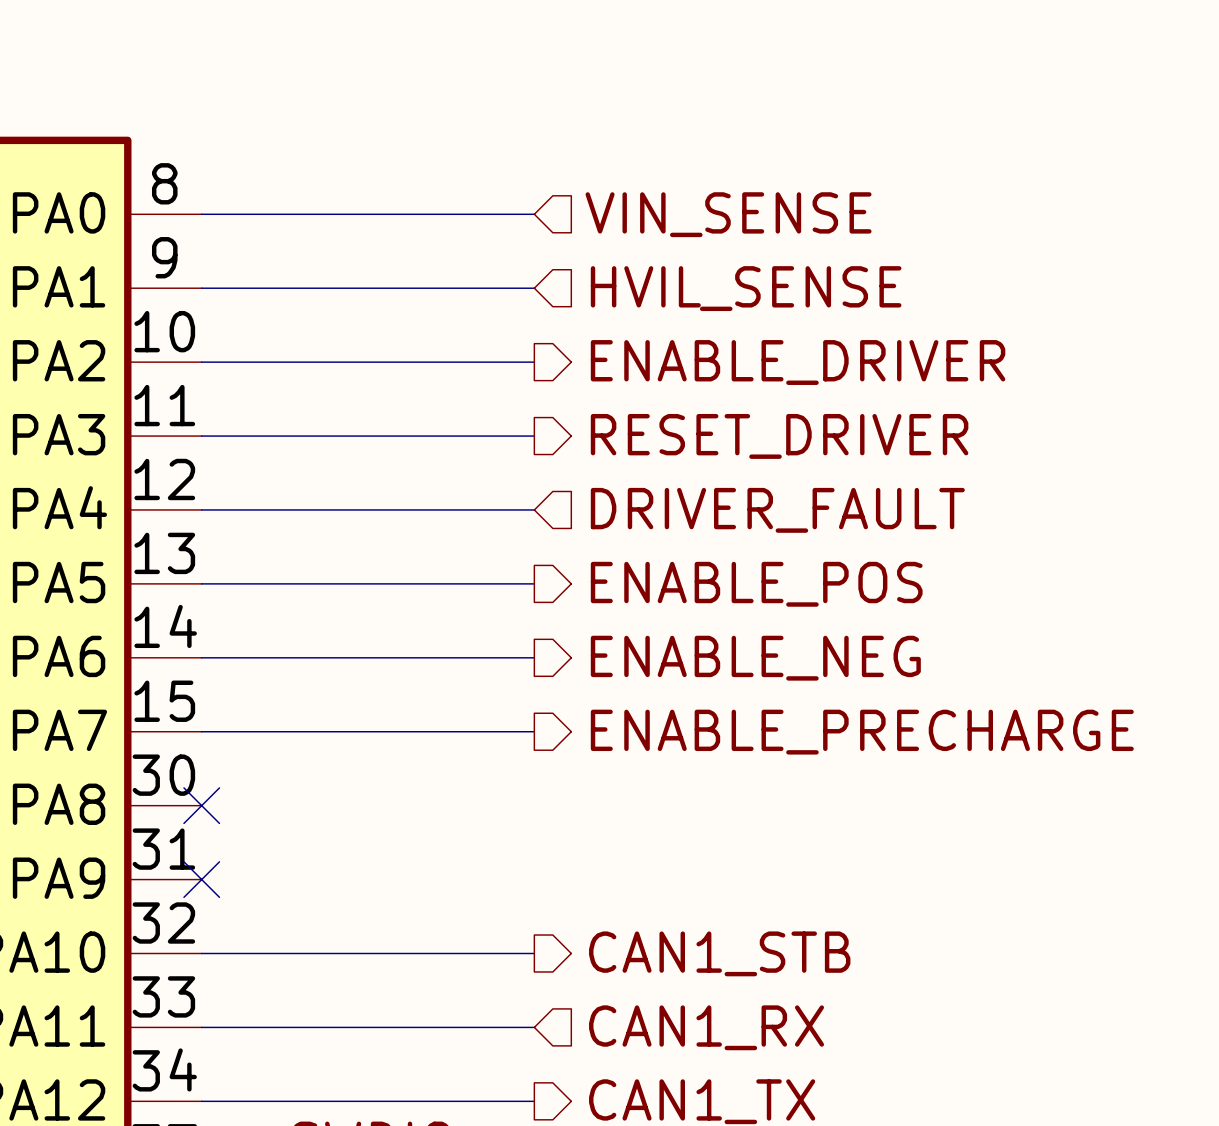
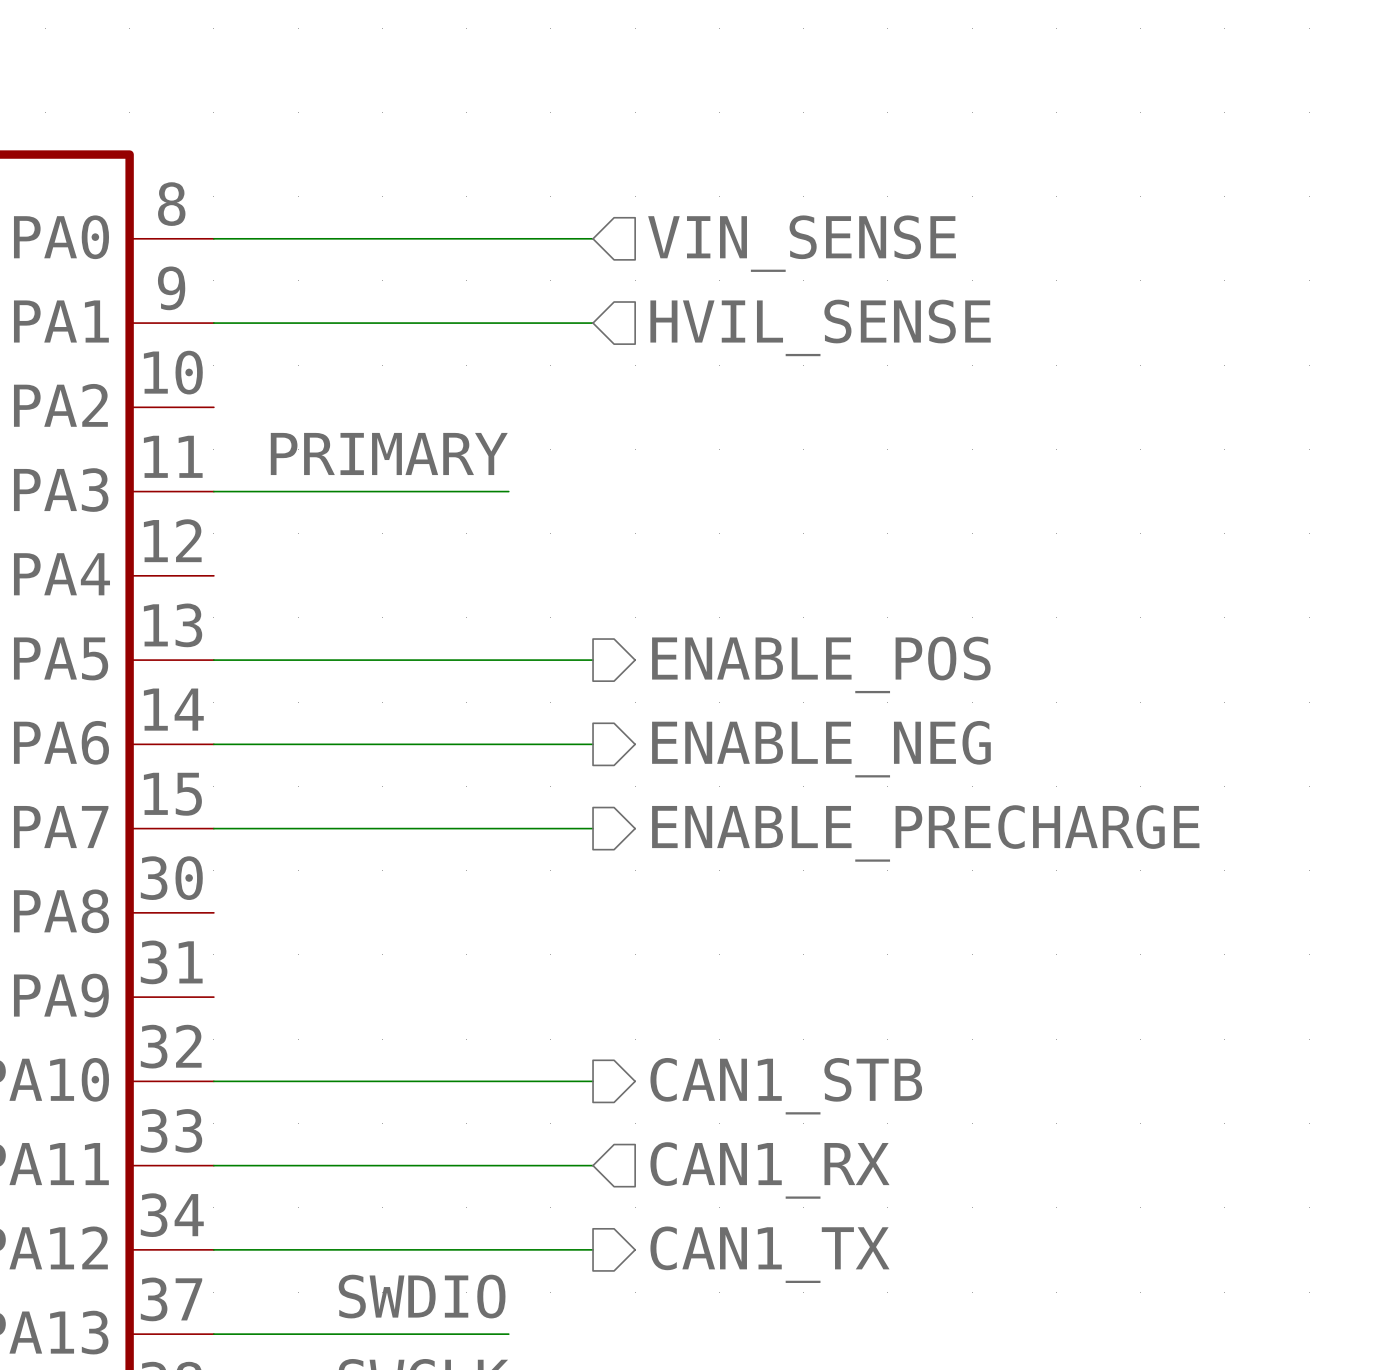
wire: (201, 362) (534, 362) -> none
hierarchical label: ENABLE_DRIVER (798, 362) -> none
label: none -> PRIMARY (389, 453)
wire: (460, 436) (534, 436) -> none
hierarchical label: RESET_DRIVER (779, 436) -> none
wire: (201, 509) (534, 509) -> none
hierarchical label: DRIVER_FAULT (777, 510) -> none
no-connect mark: (201, 805) -> none
no-connect mark: (201, 879) -> none

